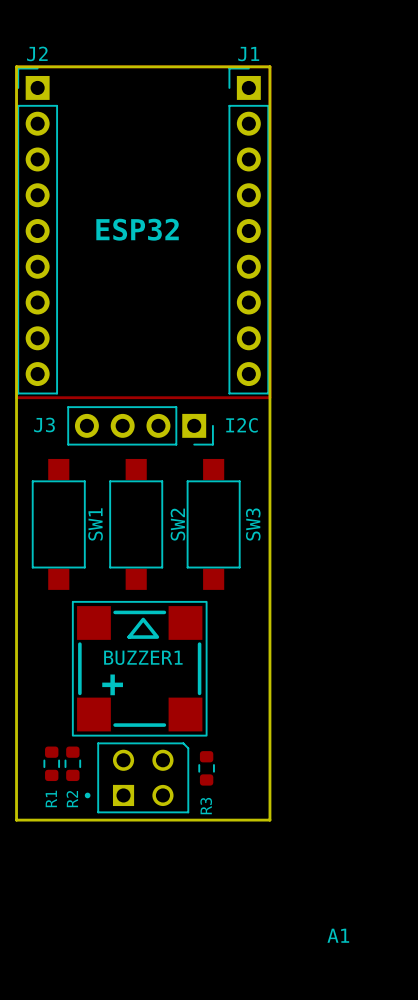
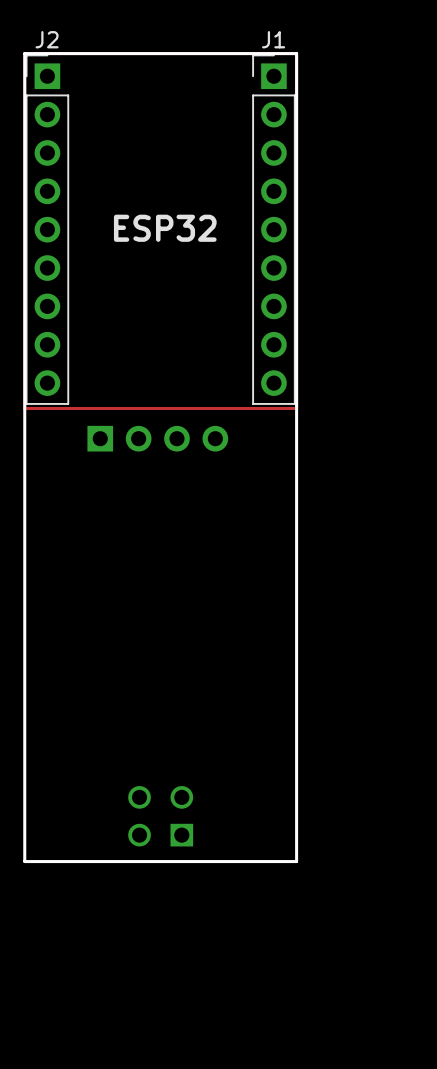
J3 side: top (140, 425) -> bottom (157, 438)
SW1: (58, 524) -> none
SW2: (136, 524) -> none
SW3: (213, 524) -> none
BUZZER1: (139, 668) -> none
R1: (51, 763) -> none
R2: (72, 763) -> none
R3: (206, 768) -> none
A1 side: top (137, 777) -> bottom (160, 816)

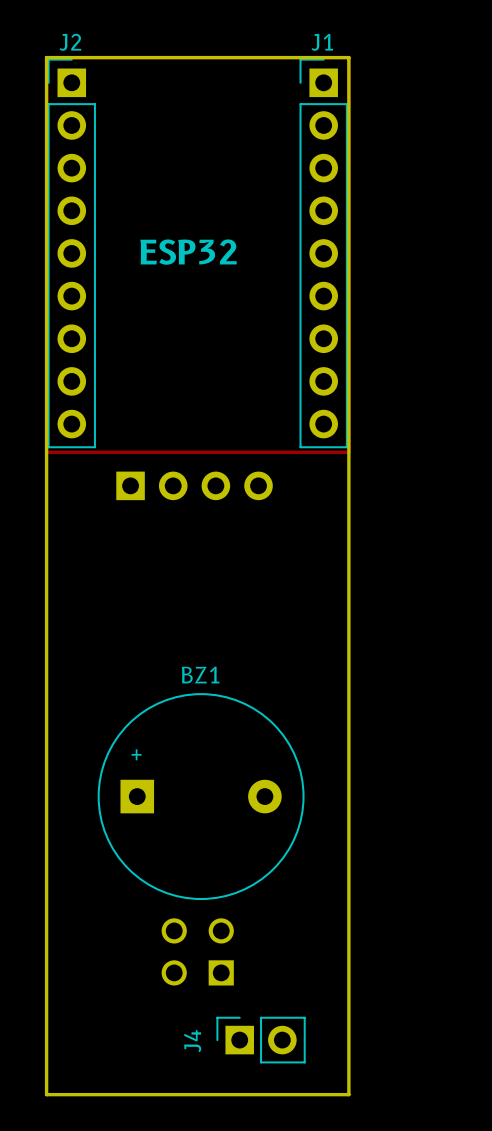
BZ1: none -> (201, 796)
part position: (160, 816) -> (197, 951)
board edge: (24, 861) (296, 861) -> (46, 956) (46, 1094) (348, 1094) (348, 956)
J4: none -> (261, 1040)

